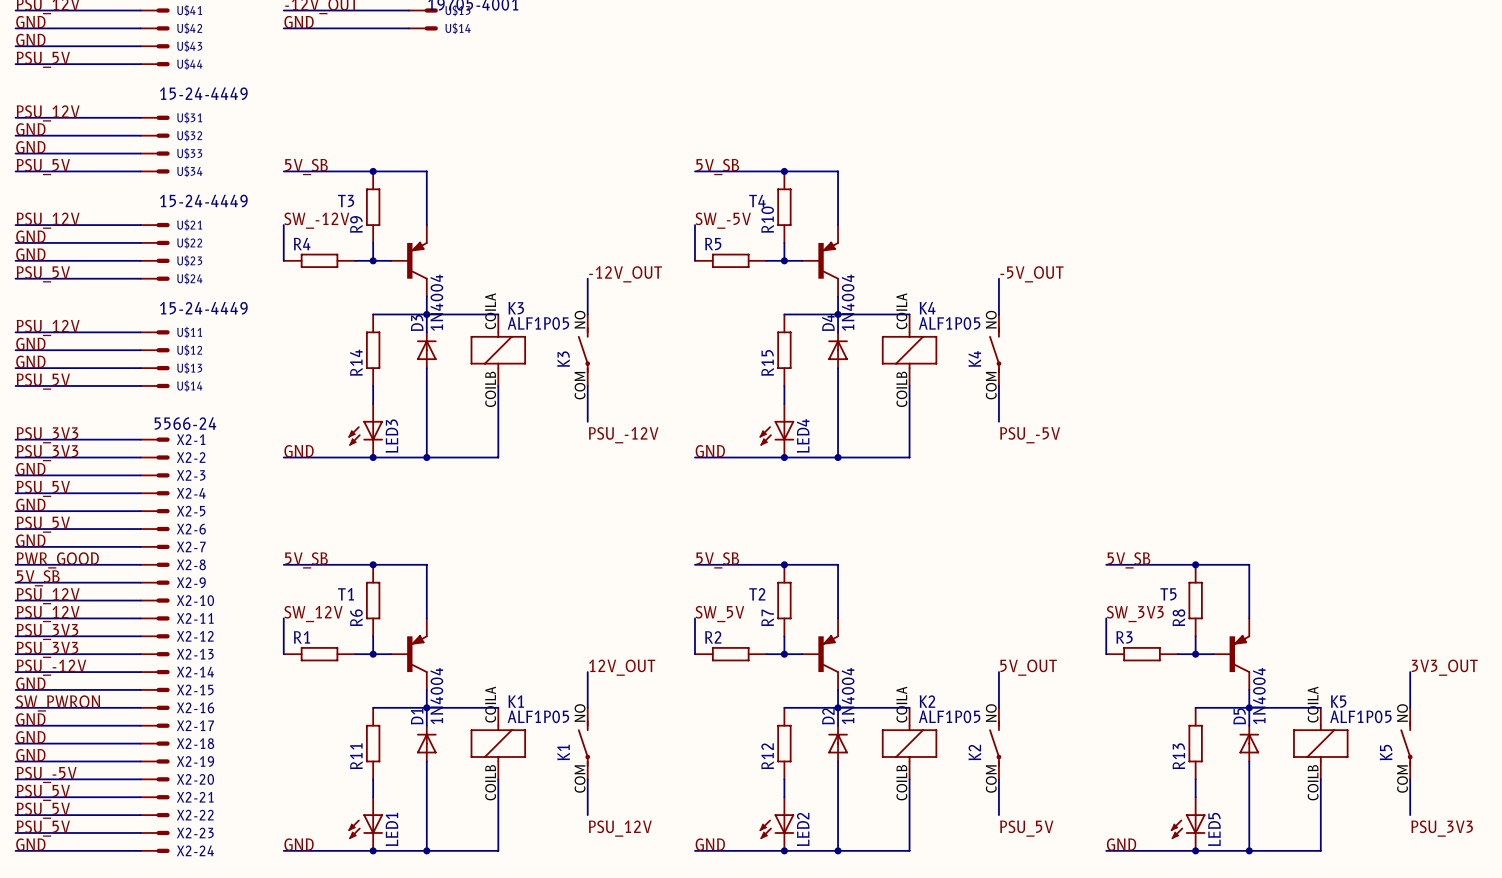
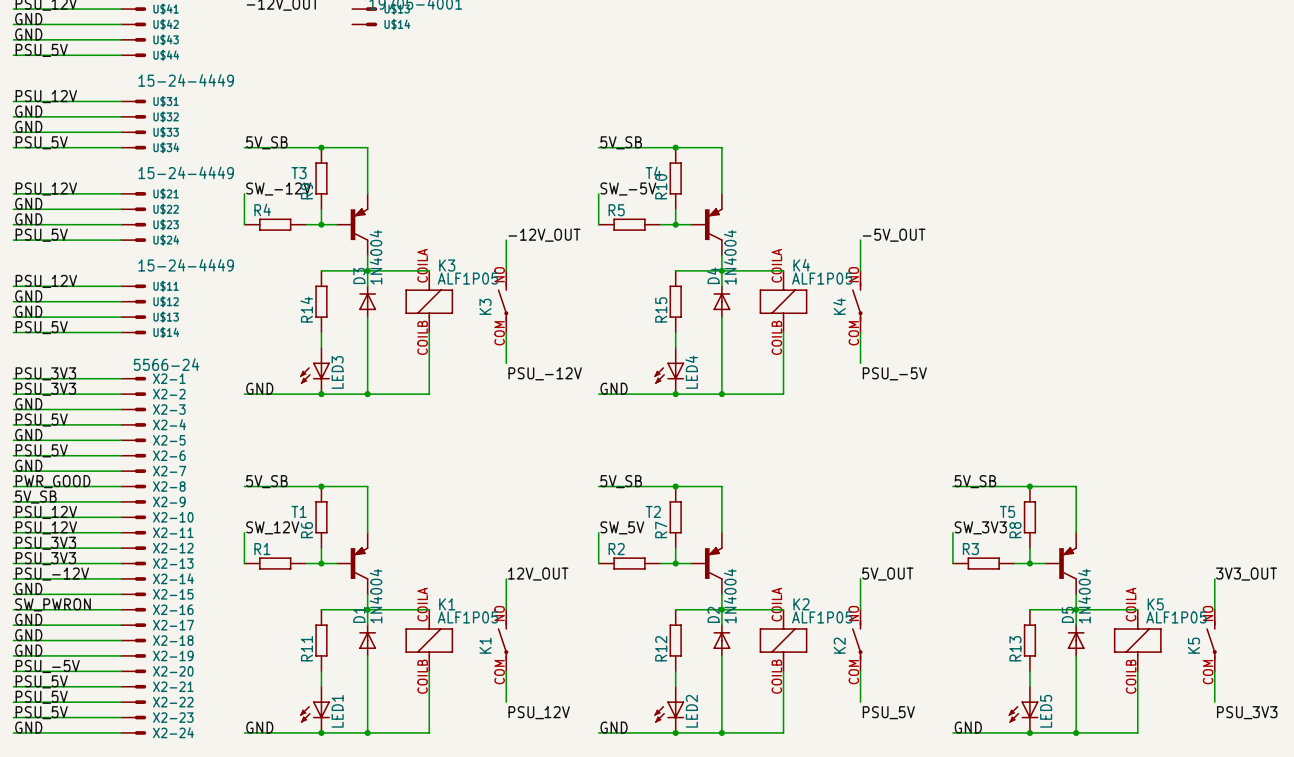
wire: (283, 10) (408, 10) -> none
label: GND (299, 22) -> none
wire: (283, 28) (408, 28) -> none

